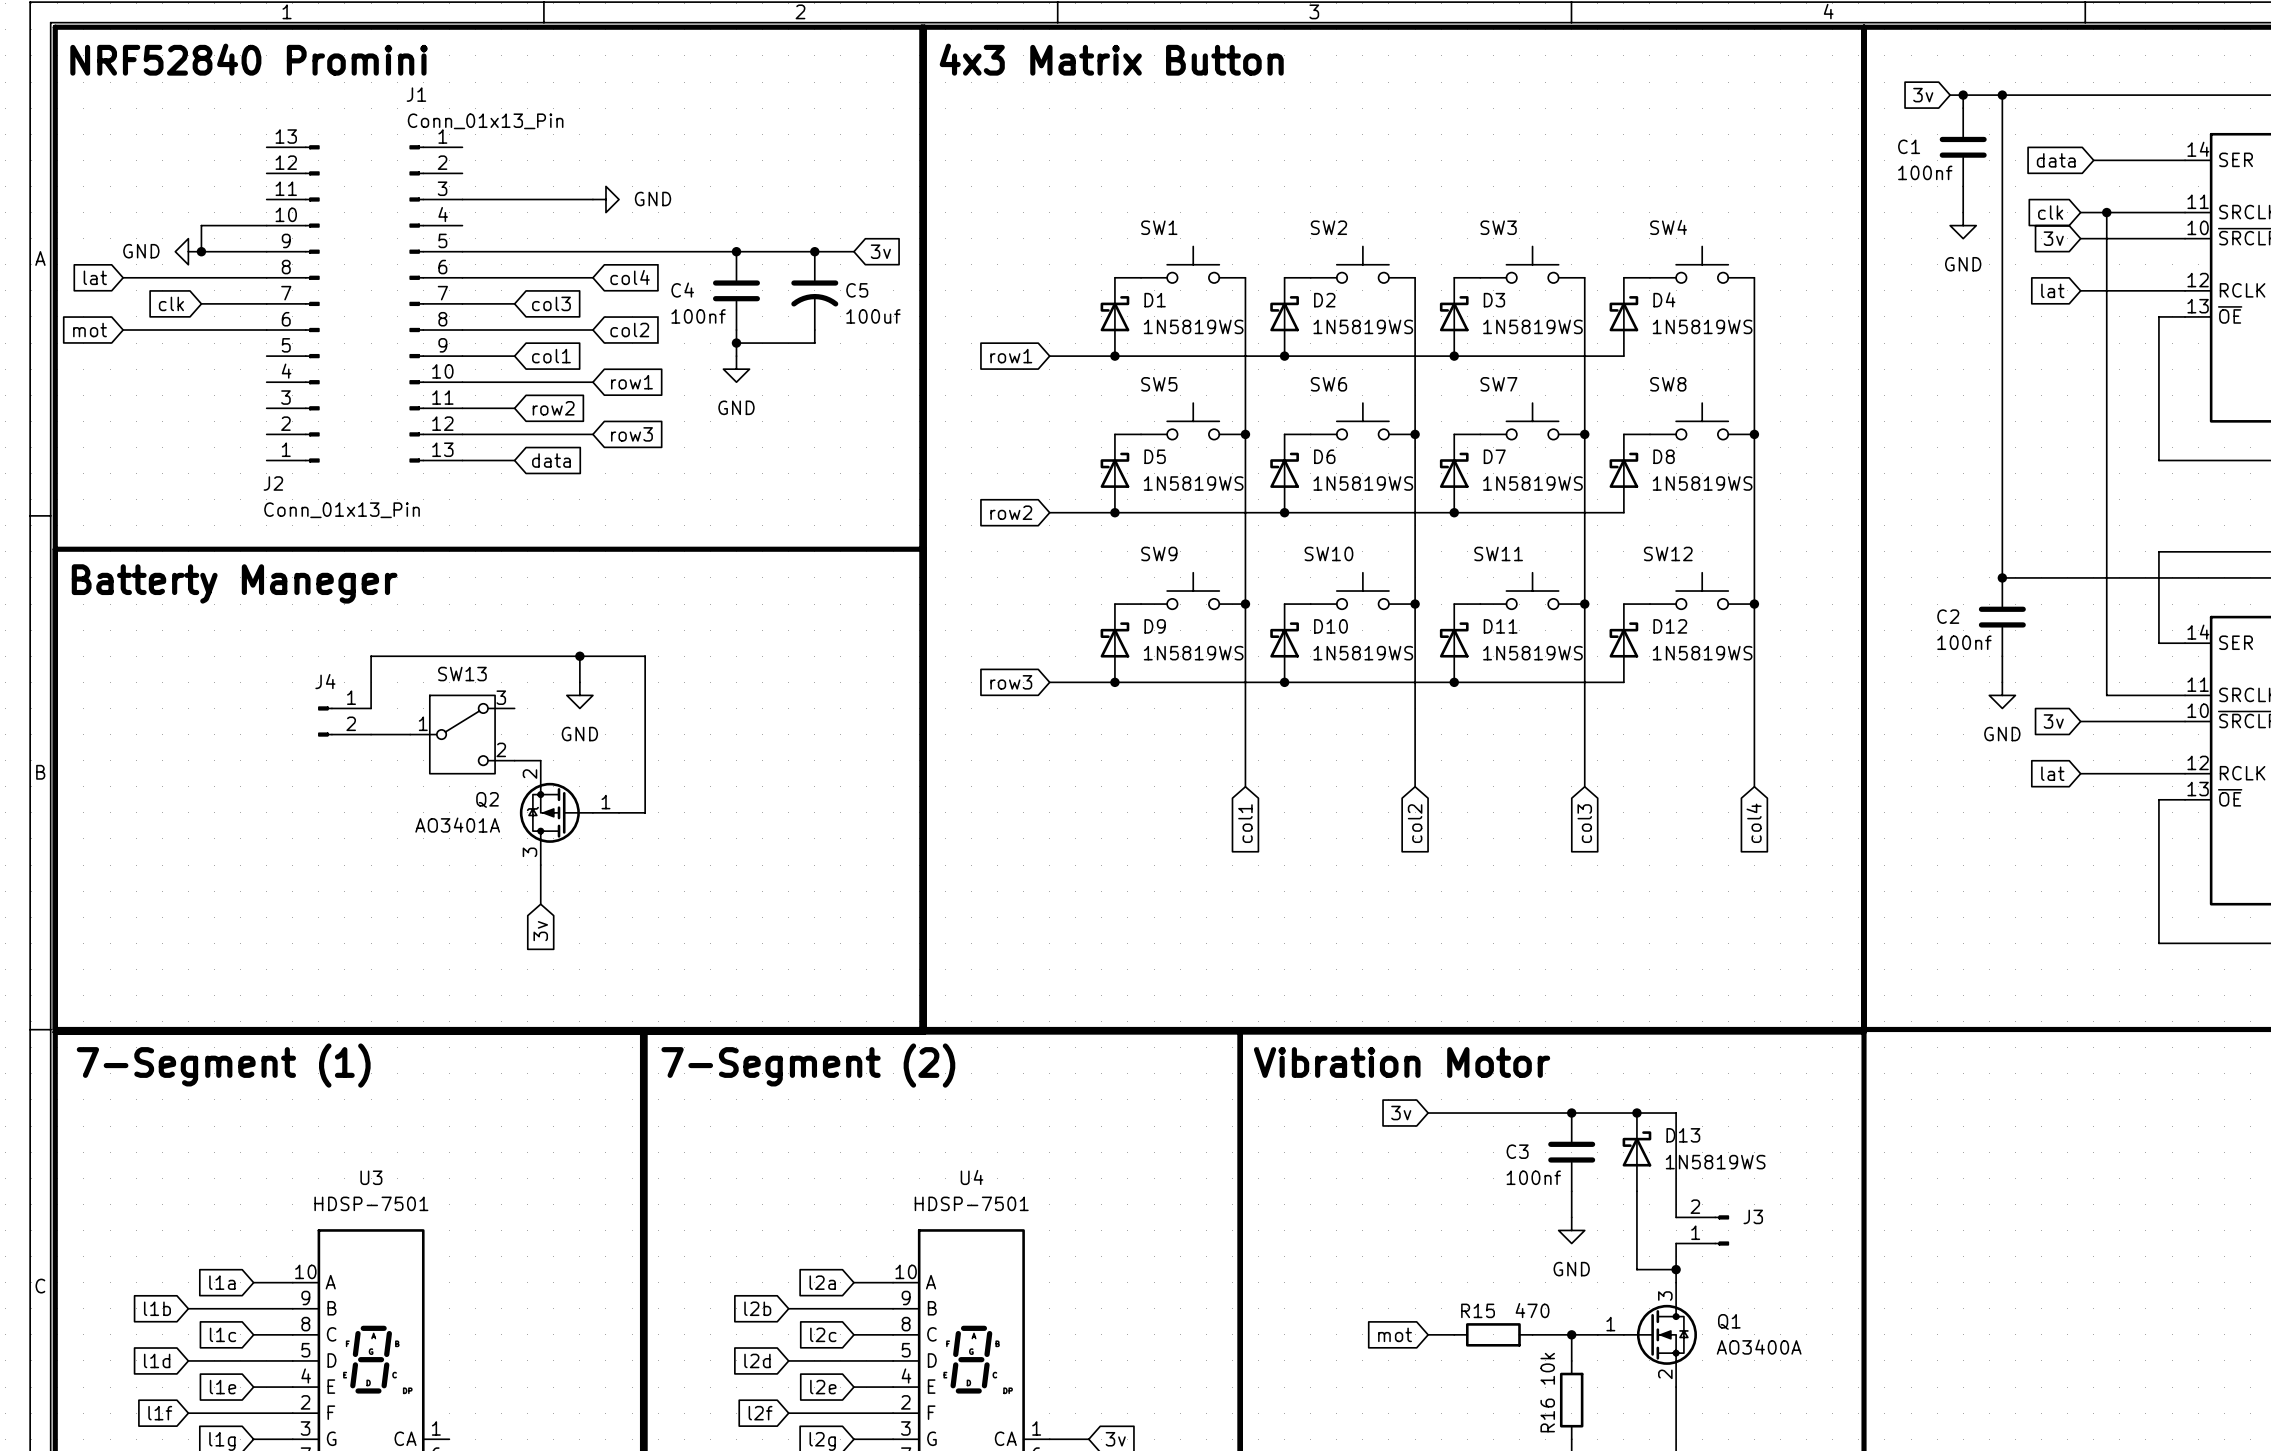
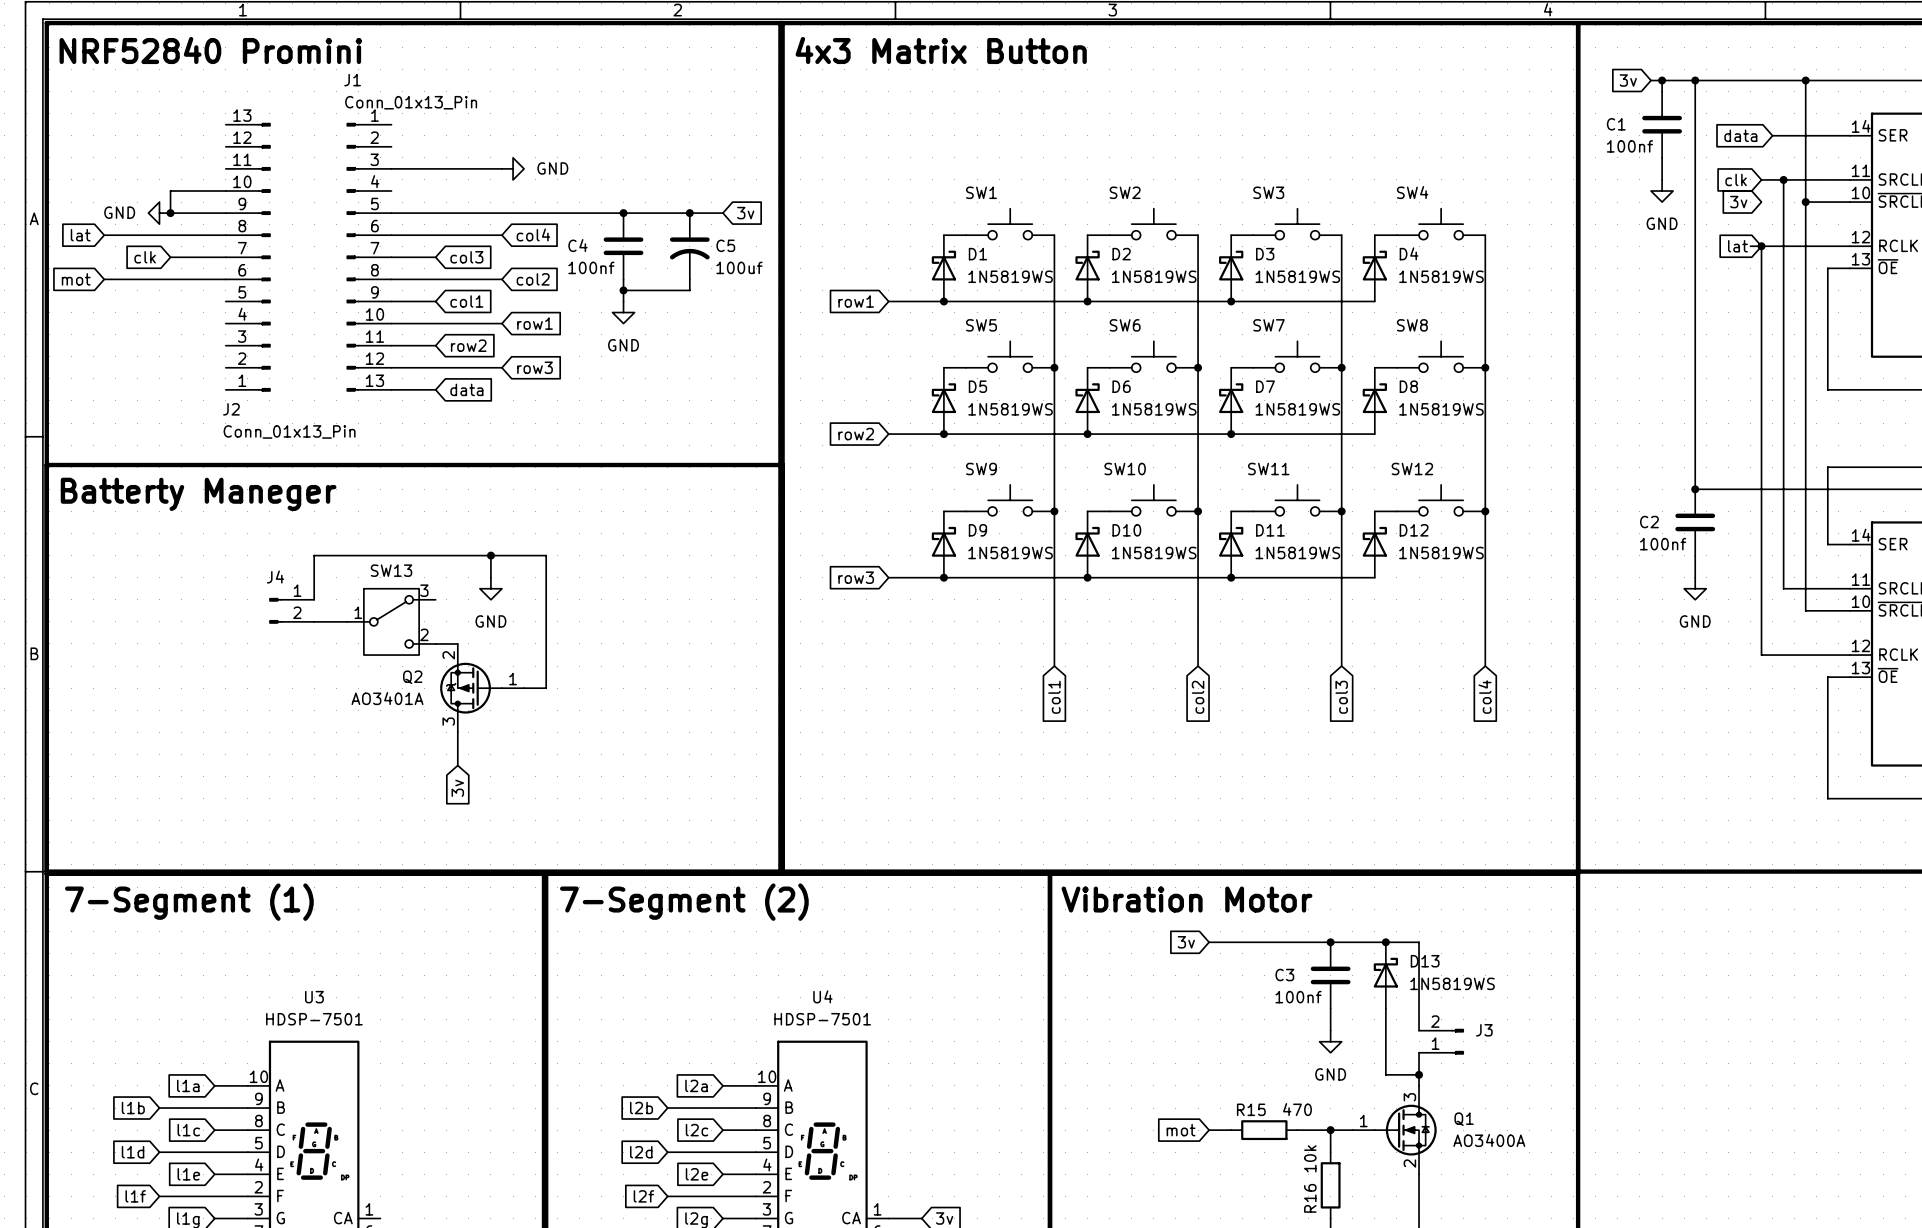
junction: none -> (1805, 80)
wire: (2080, 238) (2132, 238) -> none
junction: none -> (1805, 202)
wire: none -> (1750, 246) (1761, 246) (1761, 655)
junction: none -> (1761, 246)
global label: 3v (2053, 721) -> none
wire: (2080, 721) (2132, 721) -> (1805, 80) (1805, 610)
global label: lat (2052, 773) -> none

